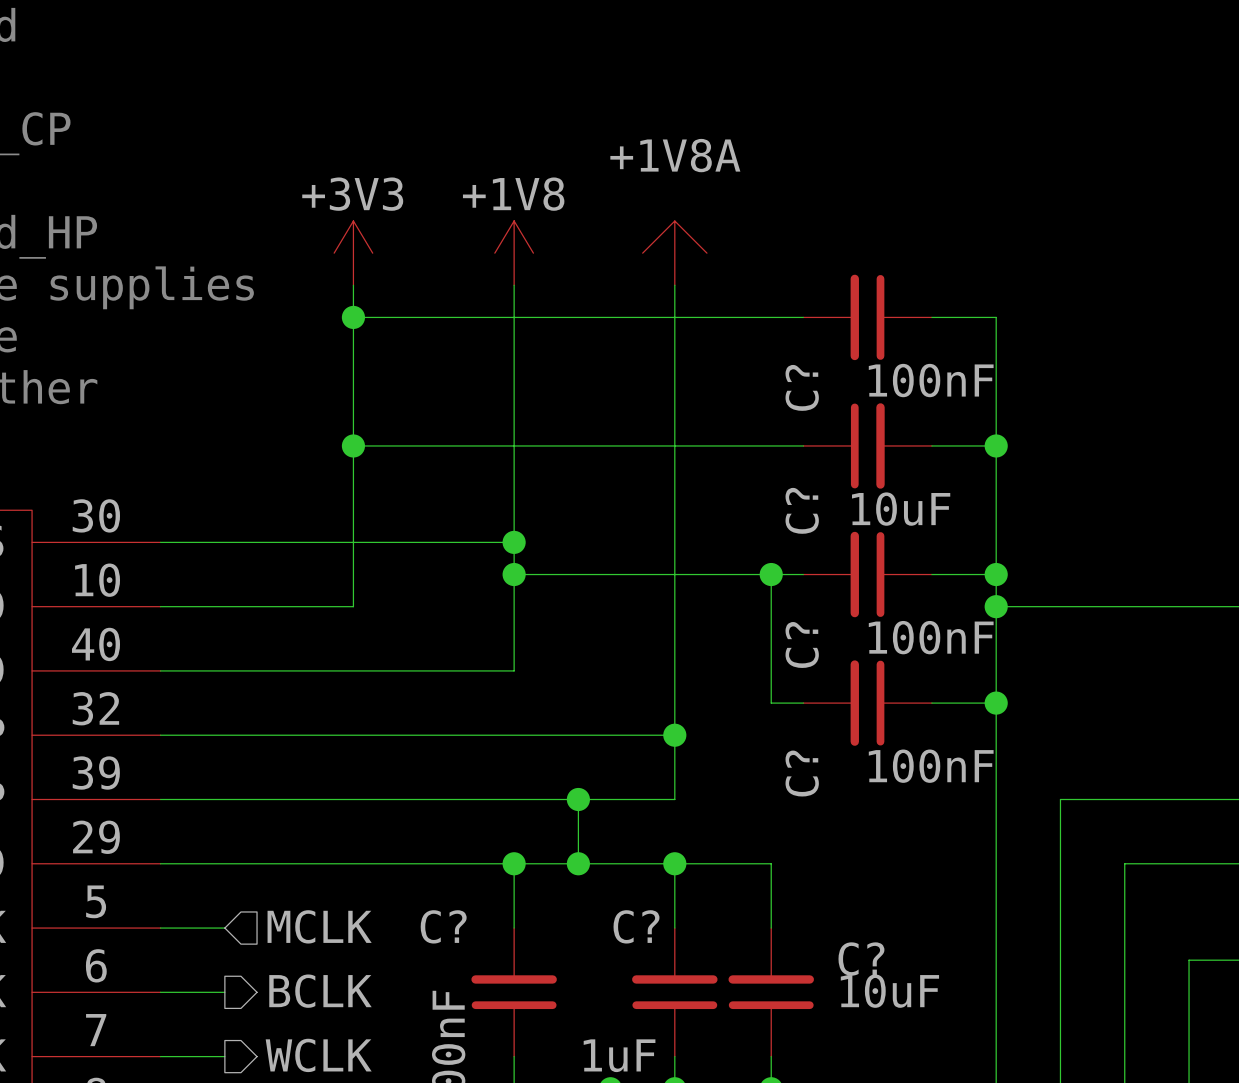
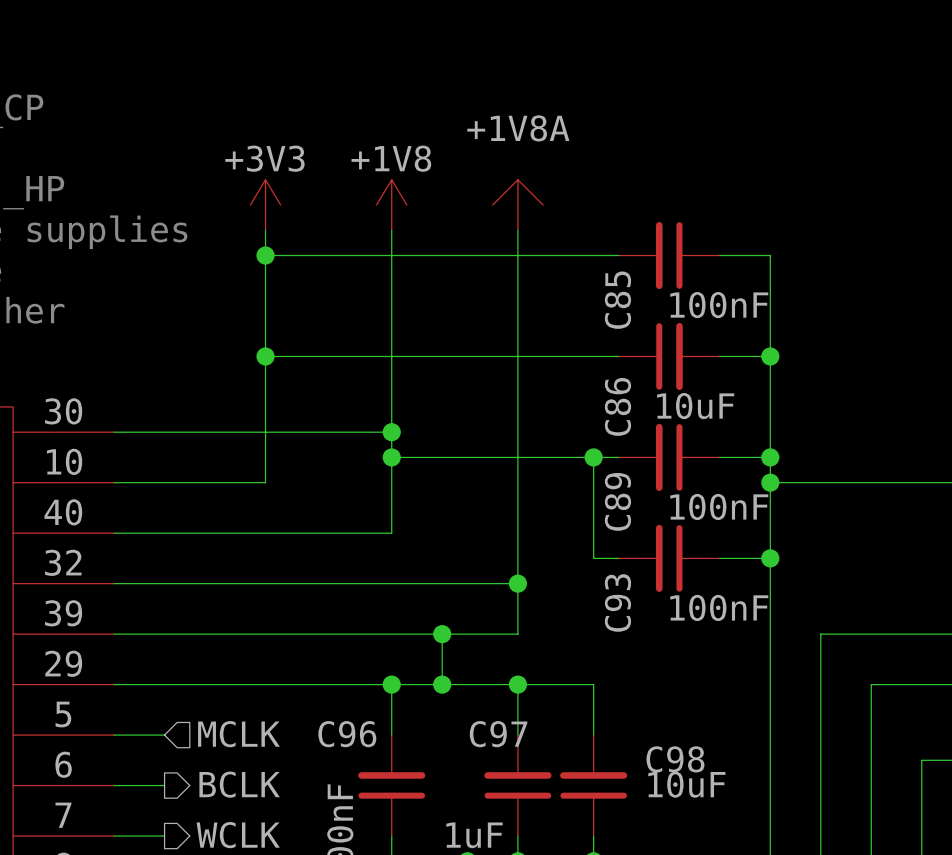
C? name: C? (802, 387) -> C85 (617, 300)
C? name: C? (802, 510) -> C86 (617, 406)
C? name: C? (802, 644) -> C89 (617, 501)
C? name: C? (802, 773) -> C93 (617, 602)
C? name: C? (443, 926) -> C96 (347, 734)
C? name: C? (636, 926) -> C97 (498, 734)
C? name: C? (861, 959) -> C98 (675, 759)

